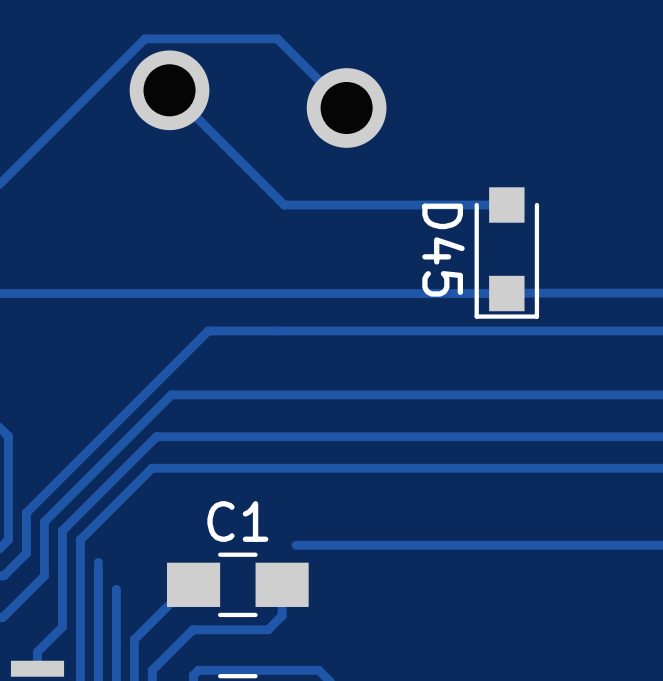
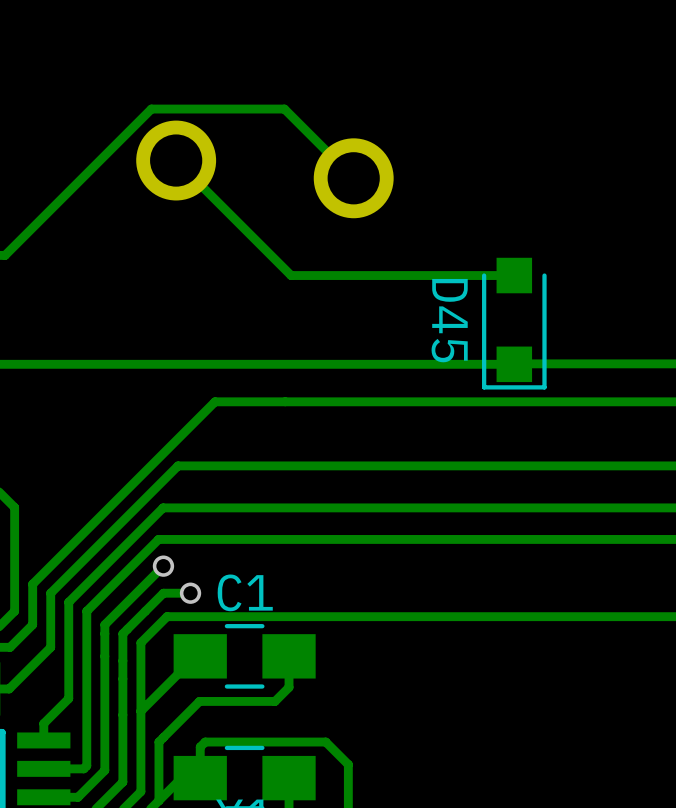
track: none -> (163, 566) (104, 624) (104, 633)
via: none -> (163, 566)
track: none -> (190, 593) (163, 593) (122, 633) (122, 660)
via: none -> (190, 593)
track: none -> (303, 616) (167, 616) (140, 642) (140, 711)

